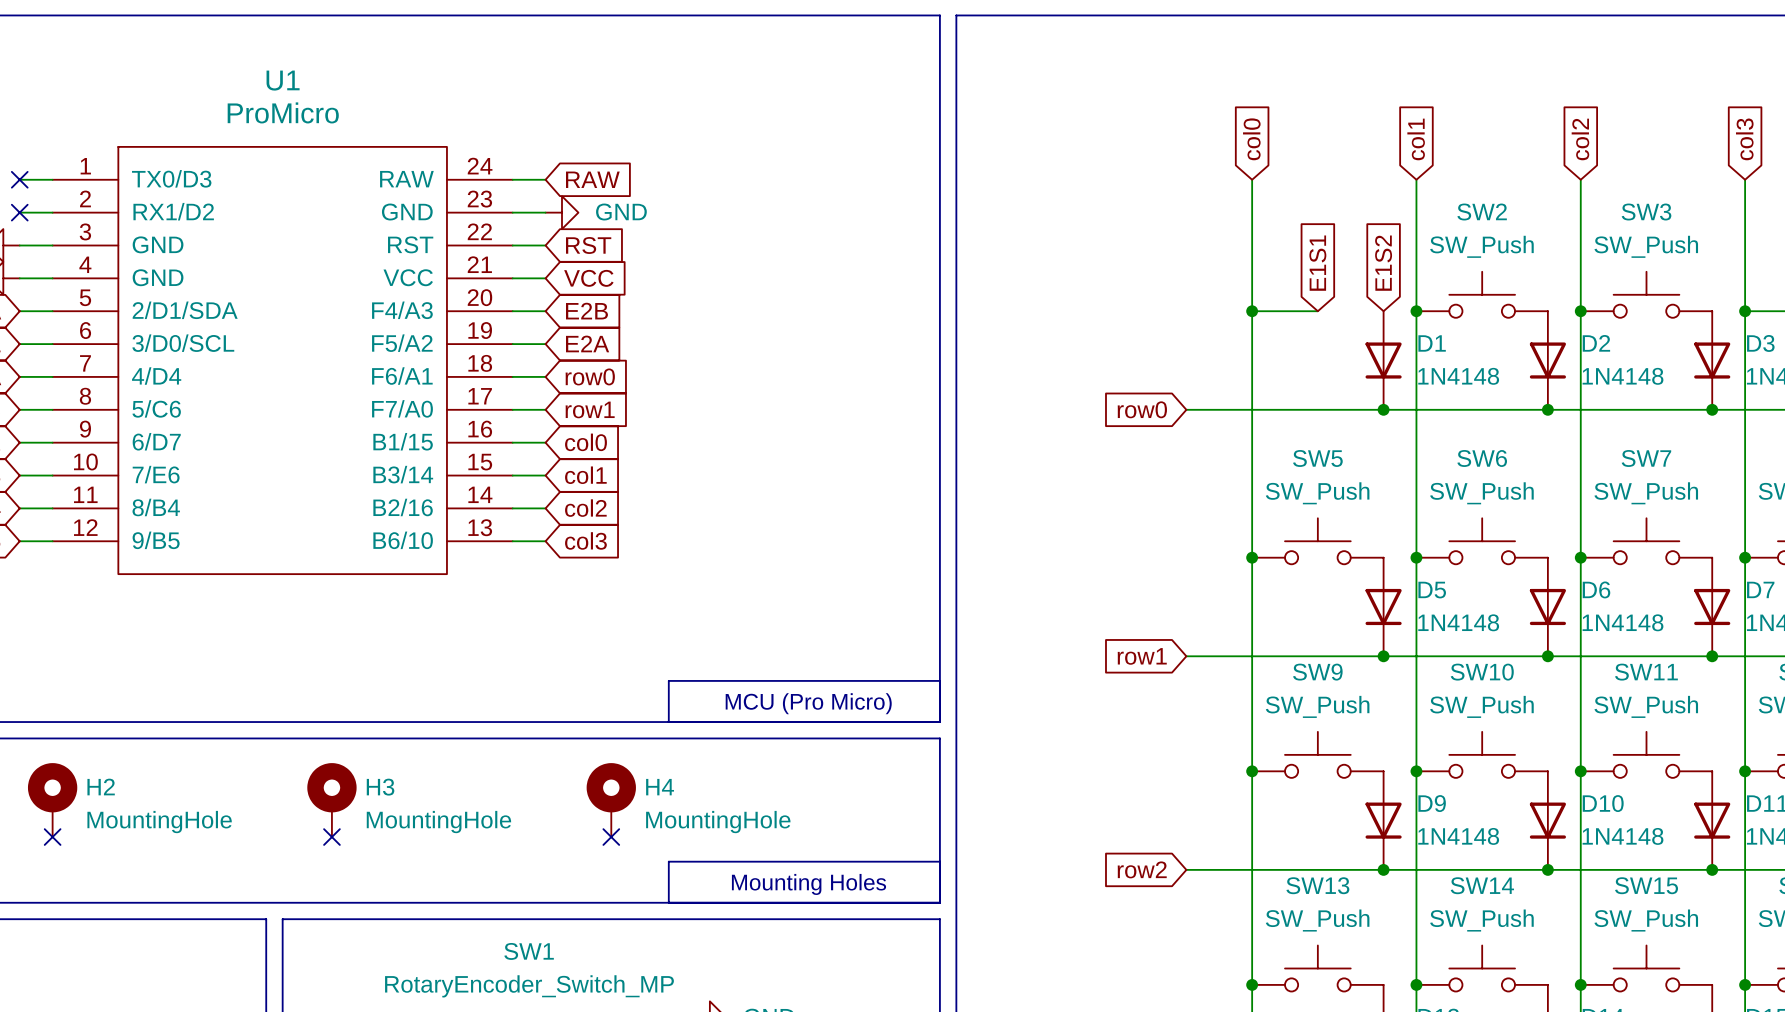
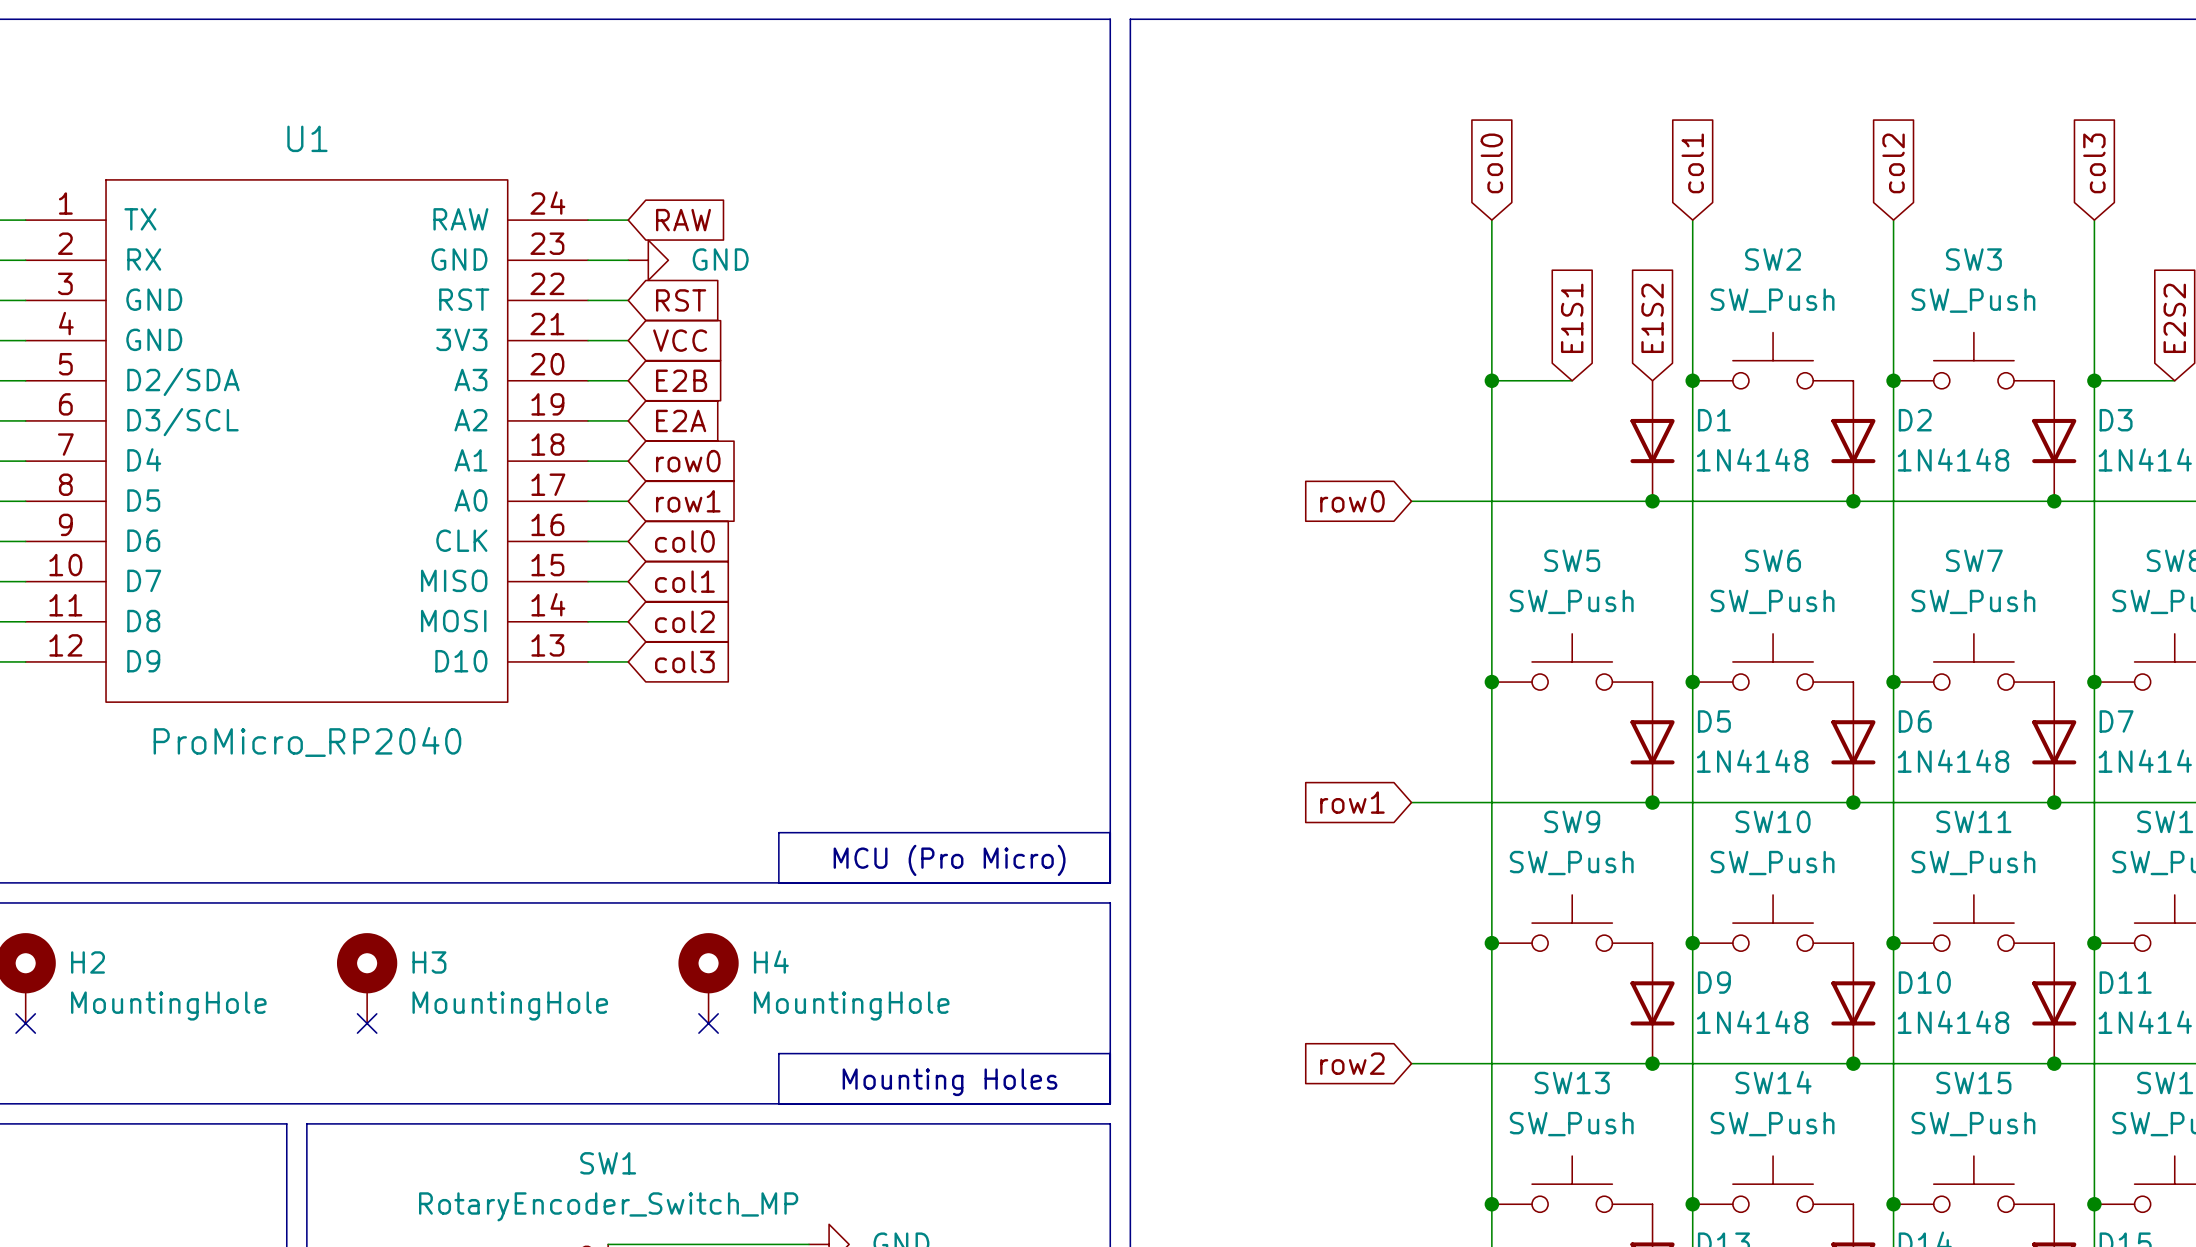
U1 name position: U1 (283, 80) -> U1 (307, 138)
U1 value: ProMicro (283, 112) -> ProMicro_RP2040 (307, 741)
U1 symbol: [52, 146, 513, 575] -> [25, 179, 589, 703]

